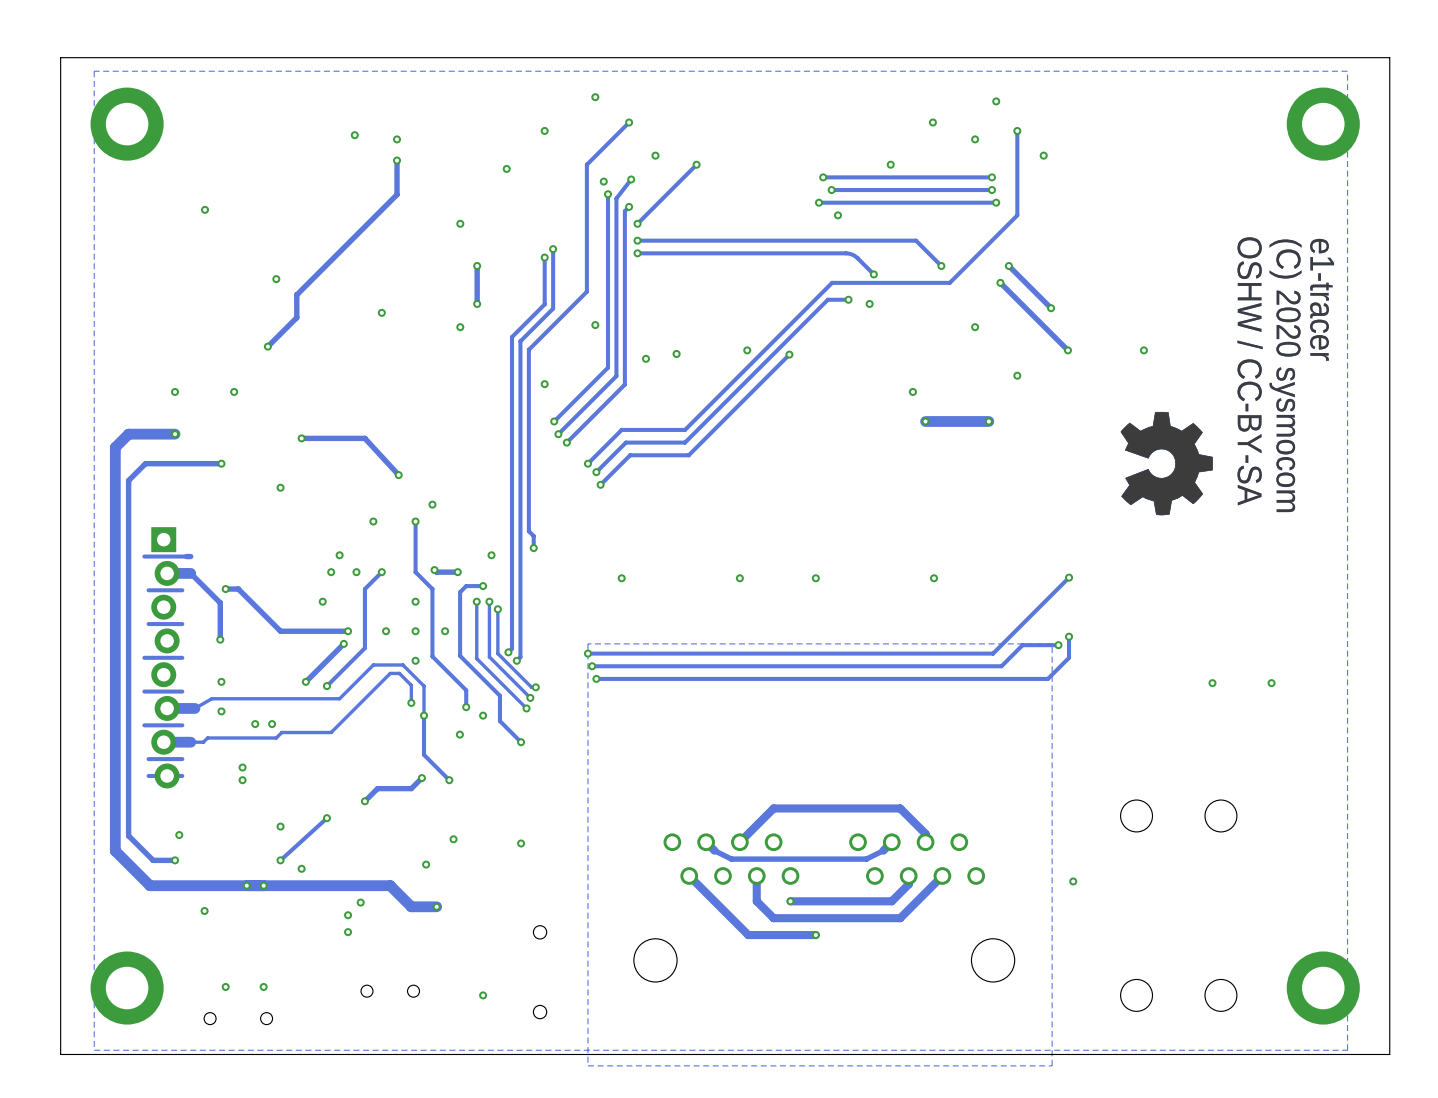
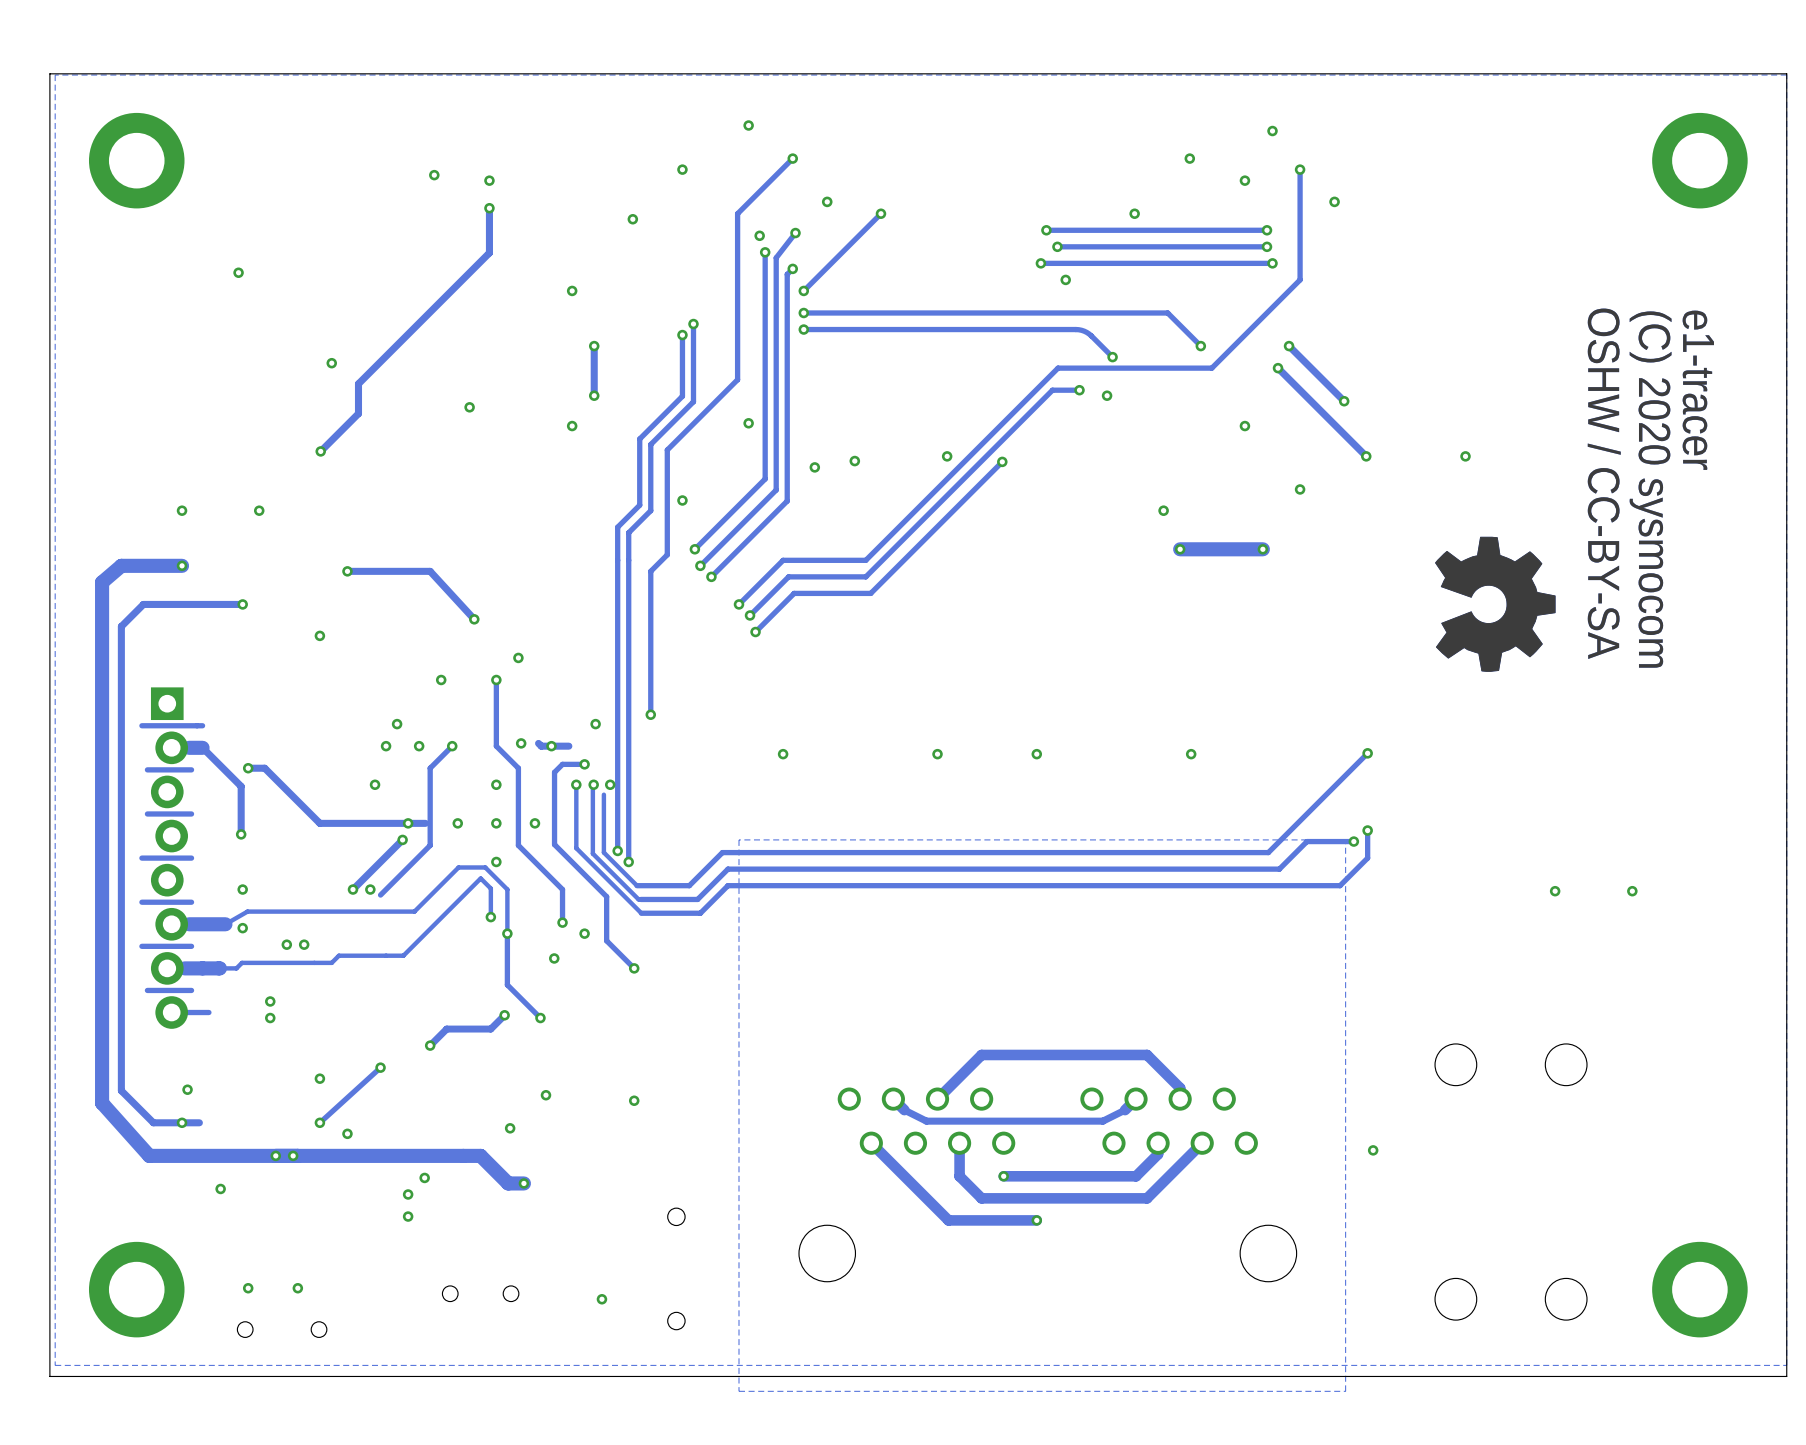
zone outline: (1347, 71) (94, 71) (94, 1050) (1347, 1050) (1347, 71) -> (1786, 75) (1786, 1365) (55, 1365) (55, 75) (1786, 75)
track: (533, 345) (528, 349) (528, 531) (533, 536) (533, 548) -> none
track: (512, 387) (512, 648) (508, 652) -> (639, 505) (617, 527) (617, 850)
via position: (175, 391) -> (182, 510)
via position: (234, 391) -> (259, 510)
track: (520, 391) (520, 438) -> (667, 450) (667, 554) (650, 571)
track: none -> (650, 510) (628, 532) (628, 861)
track: (128, 434) (115, 447) (115, 480) -> (160, 604) (143, 604) (121, 626)
track: none -> (138, 565) (121, 565) (102, 582) (102, 1103) (149, 1155) (166, 1155)
track: (175, 434) (161, 434) -> none
via position: (175, 434) -> (182, 565)
via position: (301, 438) -> (347, 571)
track: (351, 438) (364, 438) (398, 475) -> (430, 571) (474, 619)
track: (145, 463) (128, 480) (128, 835) (153, 860) -> none
track: (221, 463) (208, 463) -> (364, 571) (347, 571)
via position: (221, 463) -> (242, 604)
via position: (398, 475) -> (474, 619)
track width: thick (115, 480) (115, 835) -> thin (121, 626) (121, 1090)
via position: (280, 487) -> (319, 635)
via: none -> (518, 657)
via: (432, 504) -> none
via position: (373, 521) -> (441, 679)
track: none -> (496, 679) (496, 746) (518, 768) (518, 845) (562, 889) (562, 922)
via: none -> (496, 679)
track: (415, 521) (415, 572) (432, 589) (432, 656) (466, 690) (466, 707) -> none
via: (415, 521) -> none
track: (520, 548) (520, 657) (516, 660) -> none
via position: (533, 548) -> (650, 714)
via: none -> (397, 724)
via: (339, 555) -> none
via: none -> (595, 724)
via: (491, 555) -> none
track: (190, 556) (177, 556) -> none
via: none -> (521, 743)
via: (434, 570) -> none
via: none -> (386, 746)
via: (331, 572) -> none
via: none -> (419, 746)
via: (356, 572) -> none
via: none -> (452, 746)
track: (381, 572) (364, 589) (364, 648) (326, 686) -> (452, 746) (430, 768) (430, 845) (380, 895)
via: (381, 572) -> none
via: none -> (551, 746)
via: (457, 572) -> none
track: (177, 573) (190, 573) (220, 602) (220, 639) -> (202, 747) (241, 786) (241, 834)
track: (466, 586) (460, 592) (460, 655) (499, 695) (499, 721) (521, 742) -> (579, 764) (562, 764) (554, 772) (554, 844) (606, 896) (606, 940) (634, 968)
via: none -> (584, 764)
track: (483, 586) (469, 586) -> none
via: (483, 586) -> none
track: (225, 589) (238, 589) (280, 631) -> (248, 768) (264, 768) (319, 823) (337, 823)
via position: (225, 589) -> (248, 768)
track: (182, 590) (169, 590) -> (159, 725) (141, 725)
via position: (322, 601) -> (375, 784)
via position: (415, 601) -> (496, 784)
track: none -> (576, 784) (576, 848) (641, 913) (700, 913) (727, 885) (750, 885)
via: none -> (576, 784)
track: (476, 601) (476, 658) (526, 708) -> none
track: none -> (592, 784) (592, 853) (638, 899) (697, 899) (727, 869) (744, 869)
track: (489, 601) (489, 656) (530, 697) -> none
track: none -> (603, 794) (603, 852) (636, 885) (689, 885) (722, 852) (738, 852)
track: (497, 609) (497, 653) (531, 687) (535, 687) -> none
via: (497, 609) -> none
track: (182, 624) (169, 624) -> (164, 813) (147, 813)
via: none -> (408, 823)
via: (348, 631) -> none
via: none -> (457, 823)
via: (386, 631) -> none
via: none -> (496, 823)
via: (415, 631) -> none
via: none -> (534, 823)
via: (445, 631) -> none
via position: (220, 639) -> (241, 834)
via: none -> (402, 839)
track: (343, 643) (305, 681) -> (402, 839) (352, 889)
via: (343, 643) -> none
via: none -> (617, 850)
via: (508, 652) -> none
via: (587, 653) -> none
part position: (165, 657) -> (169, 858)
track: (182, 657) (169, 657) -> (164, 769) (147, 769)
via position: (415, 660) -> (496, 861)
via: none -> (628, 861)
via: (516, 660) -> none
track: (393, 664) (402, 664) (424, 686) (424, 754) (449, 780) -> (485, 867) (507, 889) (507, 984) (540, 1018)
via: (592, 666) -> none
track: (390, 673) (399, 673) (411, 685) (411, 702) -> (480, 878) (490, 888) (490, 917)
via: (596, 678) -> none
via position: (221, 681) -> (242, 889)
via: none -> (352, 889)
via: (326, 686) -> none
via: (535, 687) -> none
track: (182, 691) (169, 691) -> (159, 858) (141, 858)
via: (530, 697) -> none
via: none -> (490, 917)
via: (411, 702) -> none
via: none -> (562, 922)
via: (466, 707) -> none
via: (526, 708) -> none
via: none -> (242, 928)
via: (221, 711) -> none
via: none -> (507, 933)
via: (424, 715) -> none
via: none -> (584, 933)
via: (483, 715) -> none
via: none -> (286, 944)
via: (272, 724) -> none
track: (182, 725) (169, 725) -> (159, 902) (141, 902)
via: none -> (554, 958)
via: (459, 734) -> none
via position: (521, 742) -> (634, 968)
track: (182, 759) (169, 759) -> (159, 946) (141, 946)
via: none -> (270, 1001)
via: (242, 767) -> none
via: none -> (504, 1015)
track: (421, 778) (411, 788) (398, 788) -> (504, 1015) (490, 1029)
via: (421, 778) -> none
via: none -> (270, 1018)
via: (242, 780) -> none
via: none -> (540, 1018)
via: (449, 780) -> none
track: (377, 788) (364, 801) -> (464, 1029) (446, 1029) (430, 1045)
via position: (364, 801) -> (430, 1045)
track: (326, 818) (280, 860) -> (380, 1067) (319, 1122)
via position: (326, 818) -> (380, 1067)
via position: (280, 826) -> (319, 1078)
track: (115, 835) (115, 851) (150, 885) -> (121, 1090) (153, 1122) (170, 1122)
via position: (179, 835) -> (187, 1089)
via position: (453, 839) -> (545, 1095)
via position: (521, 843) -> (634, 1100)
via position: (175, 860) -> (182, 1122)
via: none -> (319, 1122)
via: (280, 860) -> none
via position: (426, 864) -> (510, 1128)
via: none -> (347, 1133)
via: (301, 868) -> none
via: none -> (275, 1155)
via: (263, 885) -> none
via: none -> (424, 1177)
via: (360, 902) -> none
track: (436, 906) (423, 906) -> (164, 990) (147, 990)
via position: (436, 906) -> (523, 1183)
via position: (204, 911) -> (220, 1188)
via: none -> (408, 1194)
via: (348, 915) -> none
via: none -> (408, 1216)
via: (348, 932) -> none
via: none -> (248, 1288)
via: (225, 986) -> none
via: none -> (297, 1288)
via: (263, 986) -> none

